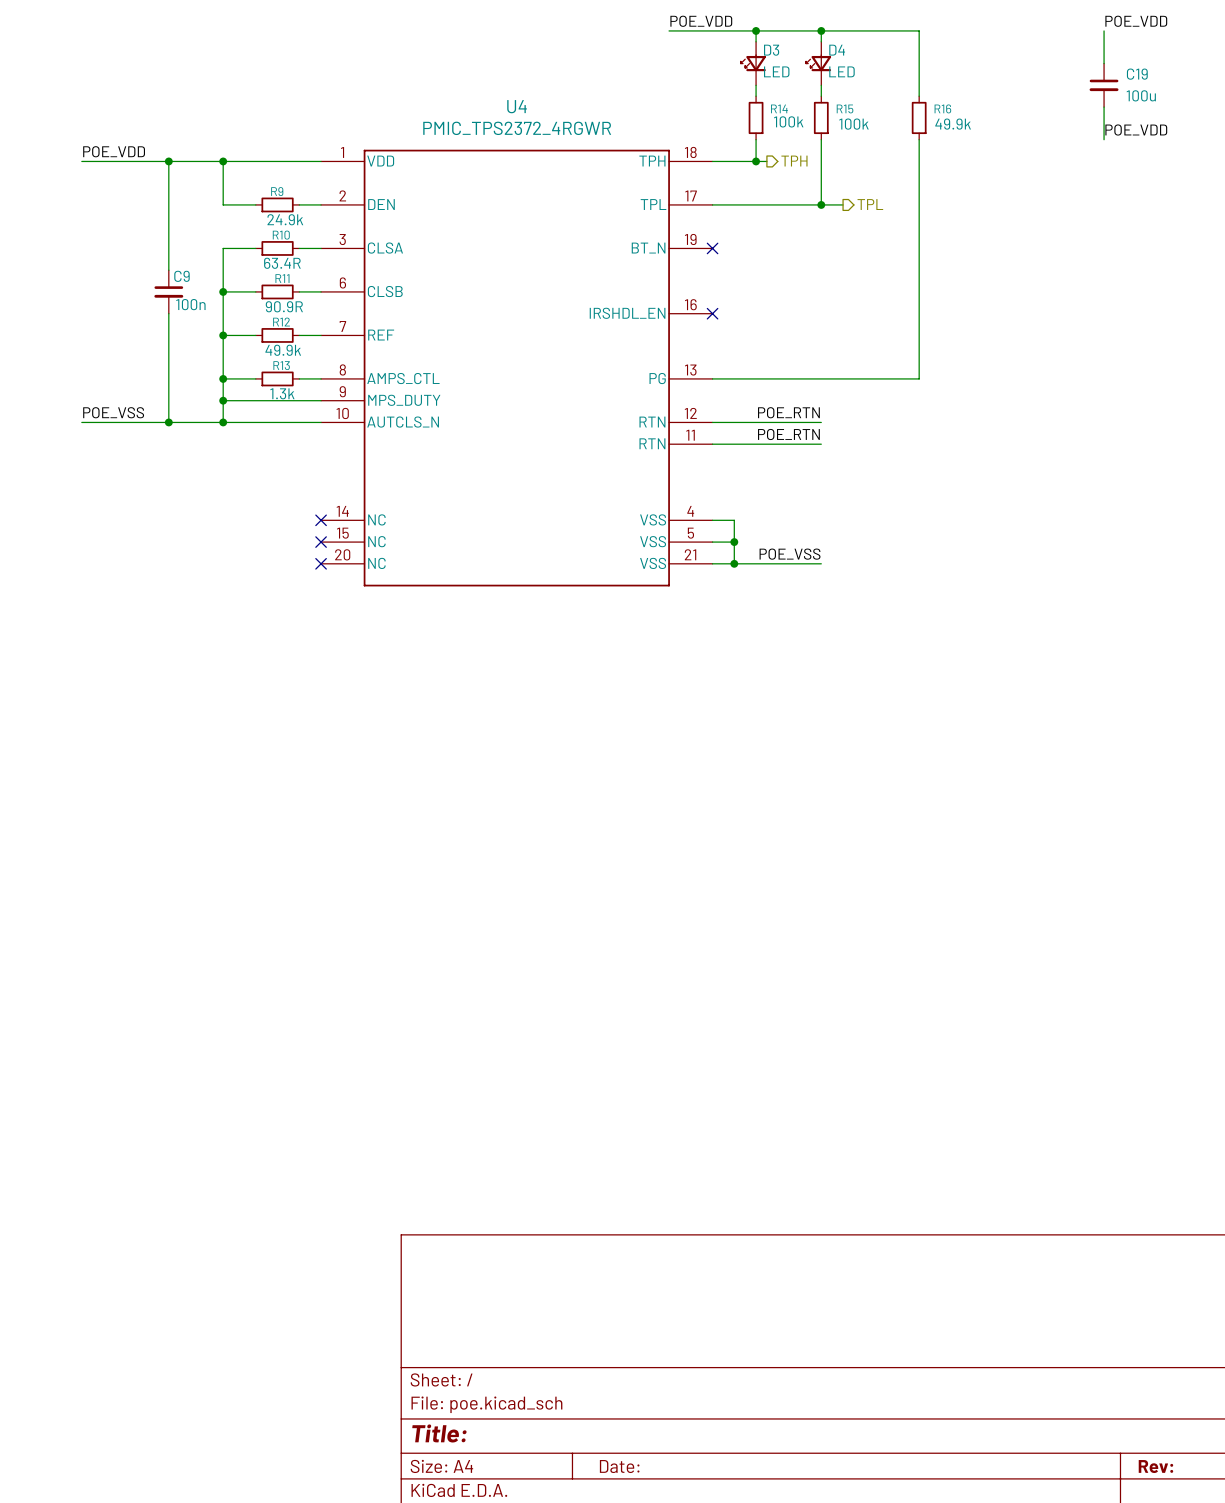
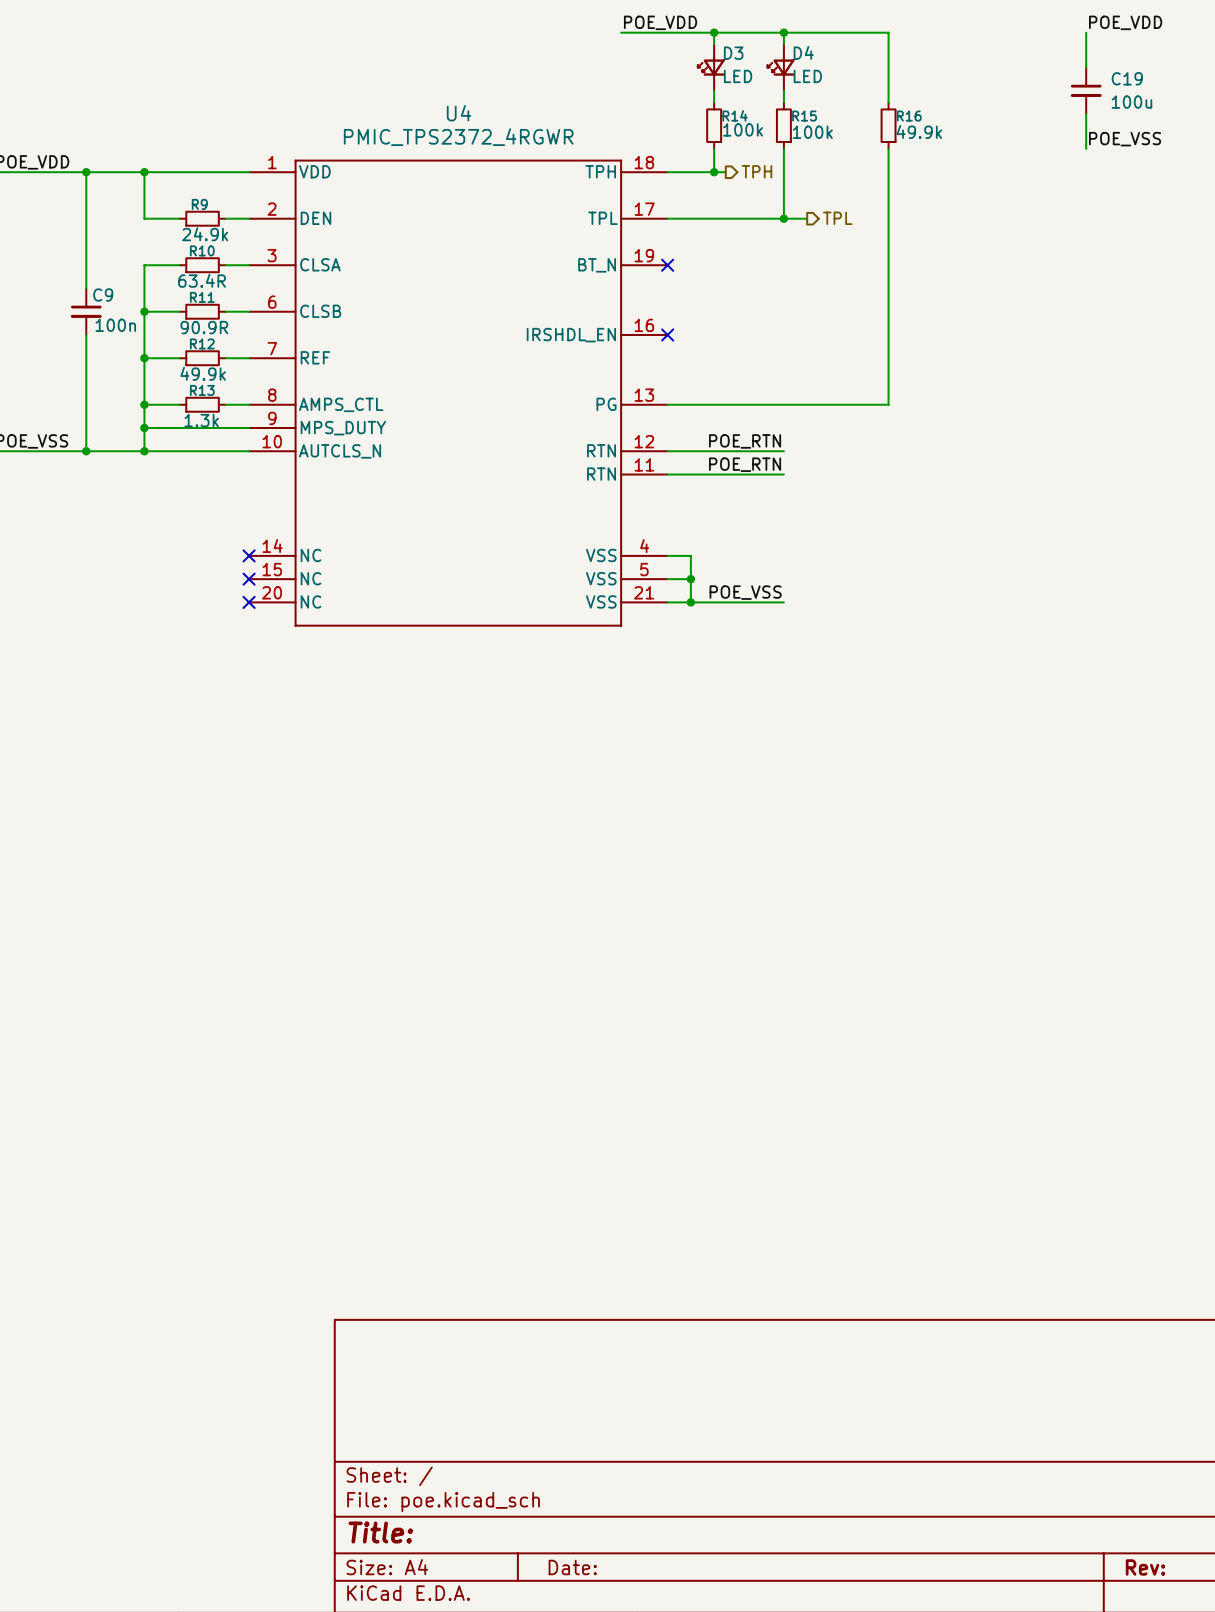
label: POE_VDD (1136, 130) -> POE_VSS (1125, 139)

